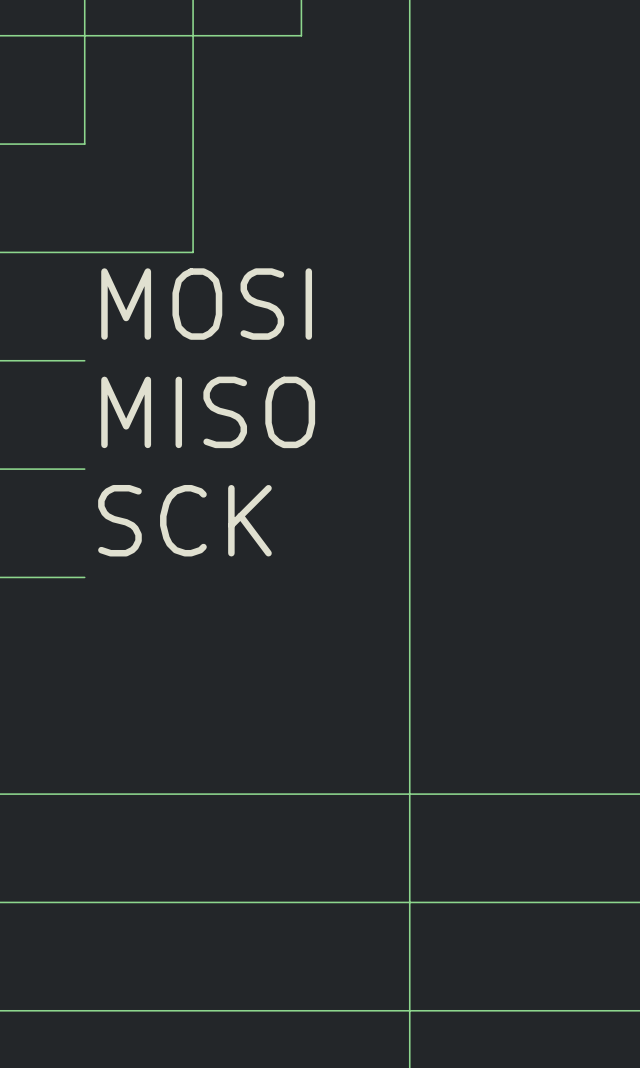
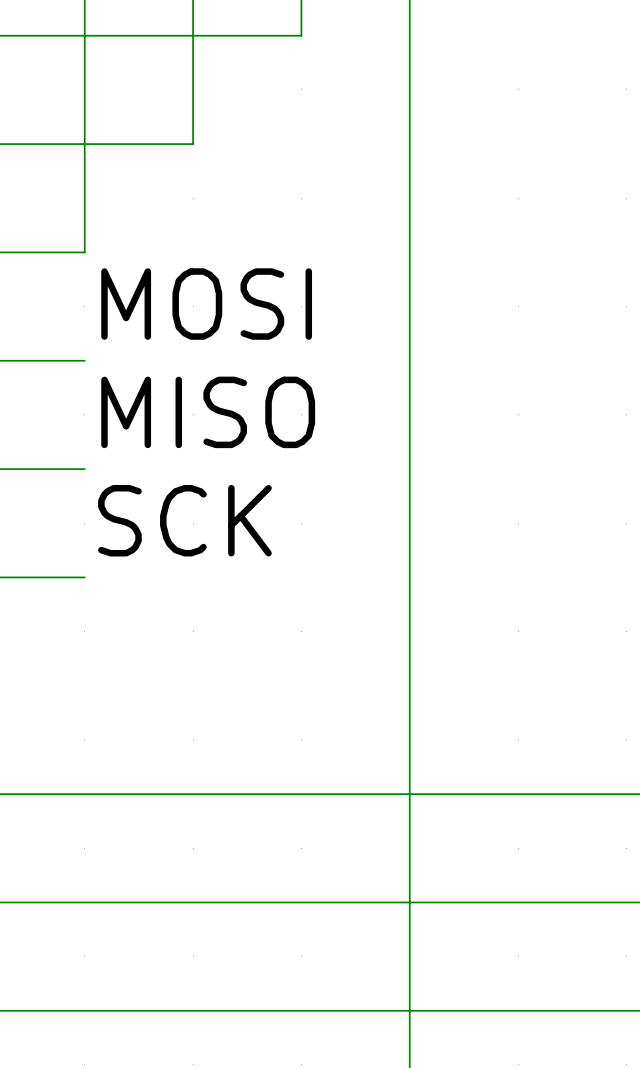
wire: (193, 144) (193, 252) (84, 252) -> (193, 144) (84, 144) (84, 252)

